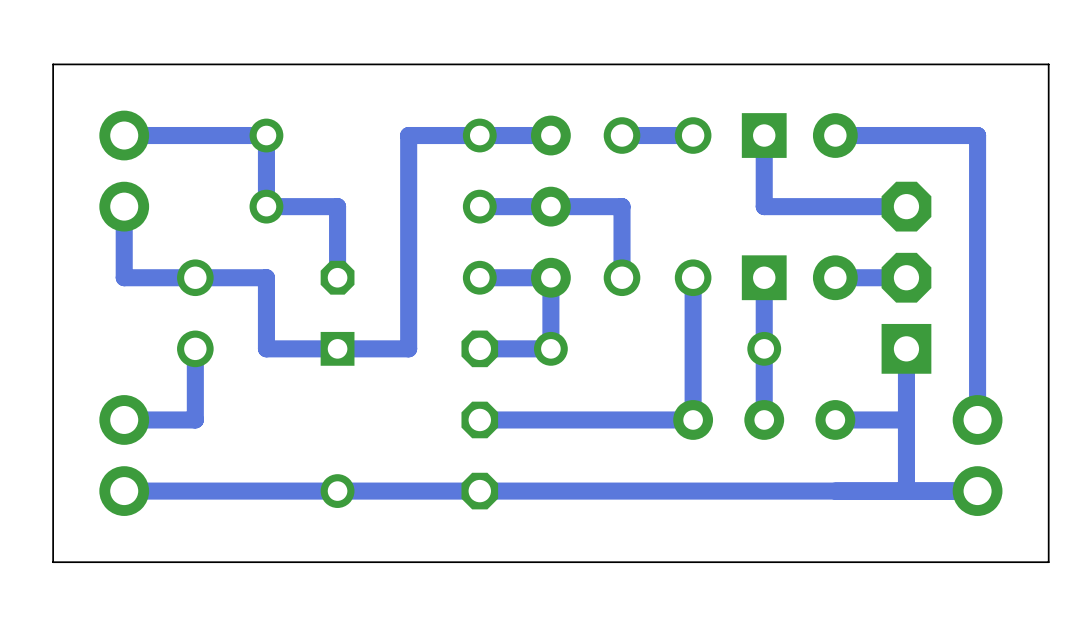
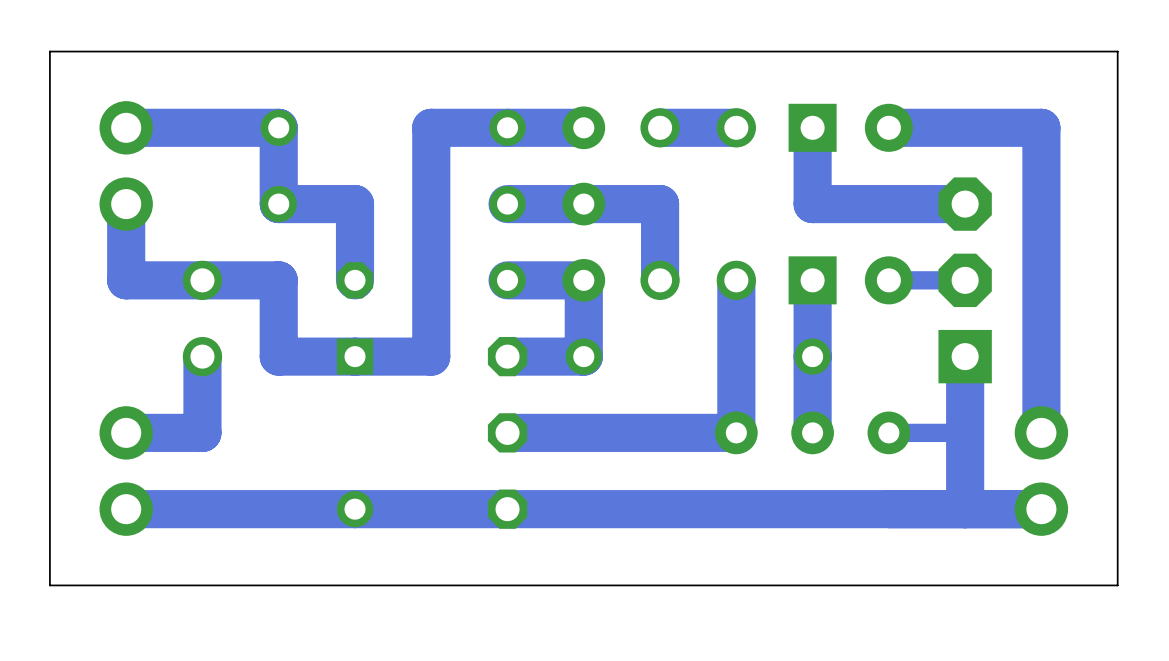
track width: thin (124, 135) (266, 135) (266, 206) (337, 206) (337, 277) -> thick (126, 127) (278, 127) (278, 204) (355, 204) (355, 280)
track width: thin (550, 135) (408, 135) (408, 348) (266, 348) (266, 277) (124, 277) (124, 206) -> thick (583, 127) (431, 127) (431, 356) (278, 356) (278, 280) (126, 280) (126, 204)
track width: thin (693, 135) (622, 135) -> thick (736, 127) (660, 127)
track width: thin (764, 135) (764, 206) (906, 206) -> thick (812, 127) (812, 204) (965, 204)
track width: thin (835, 135) (977, 135) (977, 419) -> thick (888, 127) (1041, 127) (1041, 432)
track width: thin (479, 206) (622, 206) (622, 277) -> thick (507, 204) (660, 204) (660, 280)
track width: thin (479, 277) (550, 277) (550, 348) (479, 348) -> thick (507, 280) (583, 280) (583, 356) (507, 356)
track width: thin (693, 277) (693, 419) (479, 419) -> thick (736, 280) (736, 432) (507, 432)
track width: thin (764, 277) (764, 419) -> thick (812, 280) (812, 432)
track width: thin (195, 348) (195, 419) (124, 419) -> thick (202, 356) (202, 432) (126, 432)
track width: thin (906, 348) (906, 491) -> thick (965, 356) (965, 509)
track width: thin (977, 491) (124, 491) -> thick (1041, 509) (126, 509)

